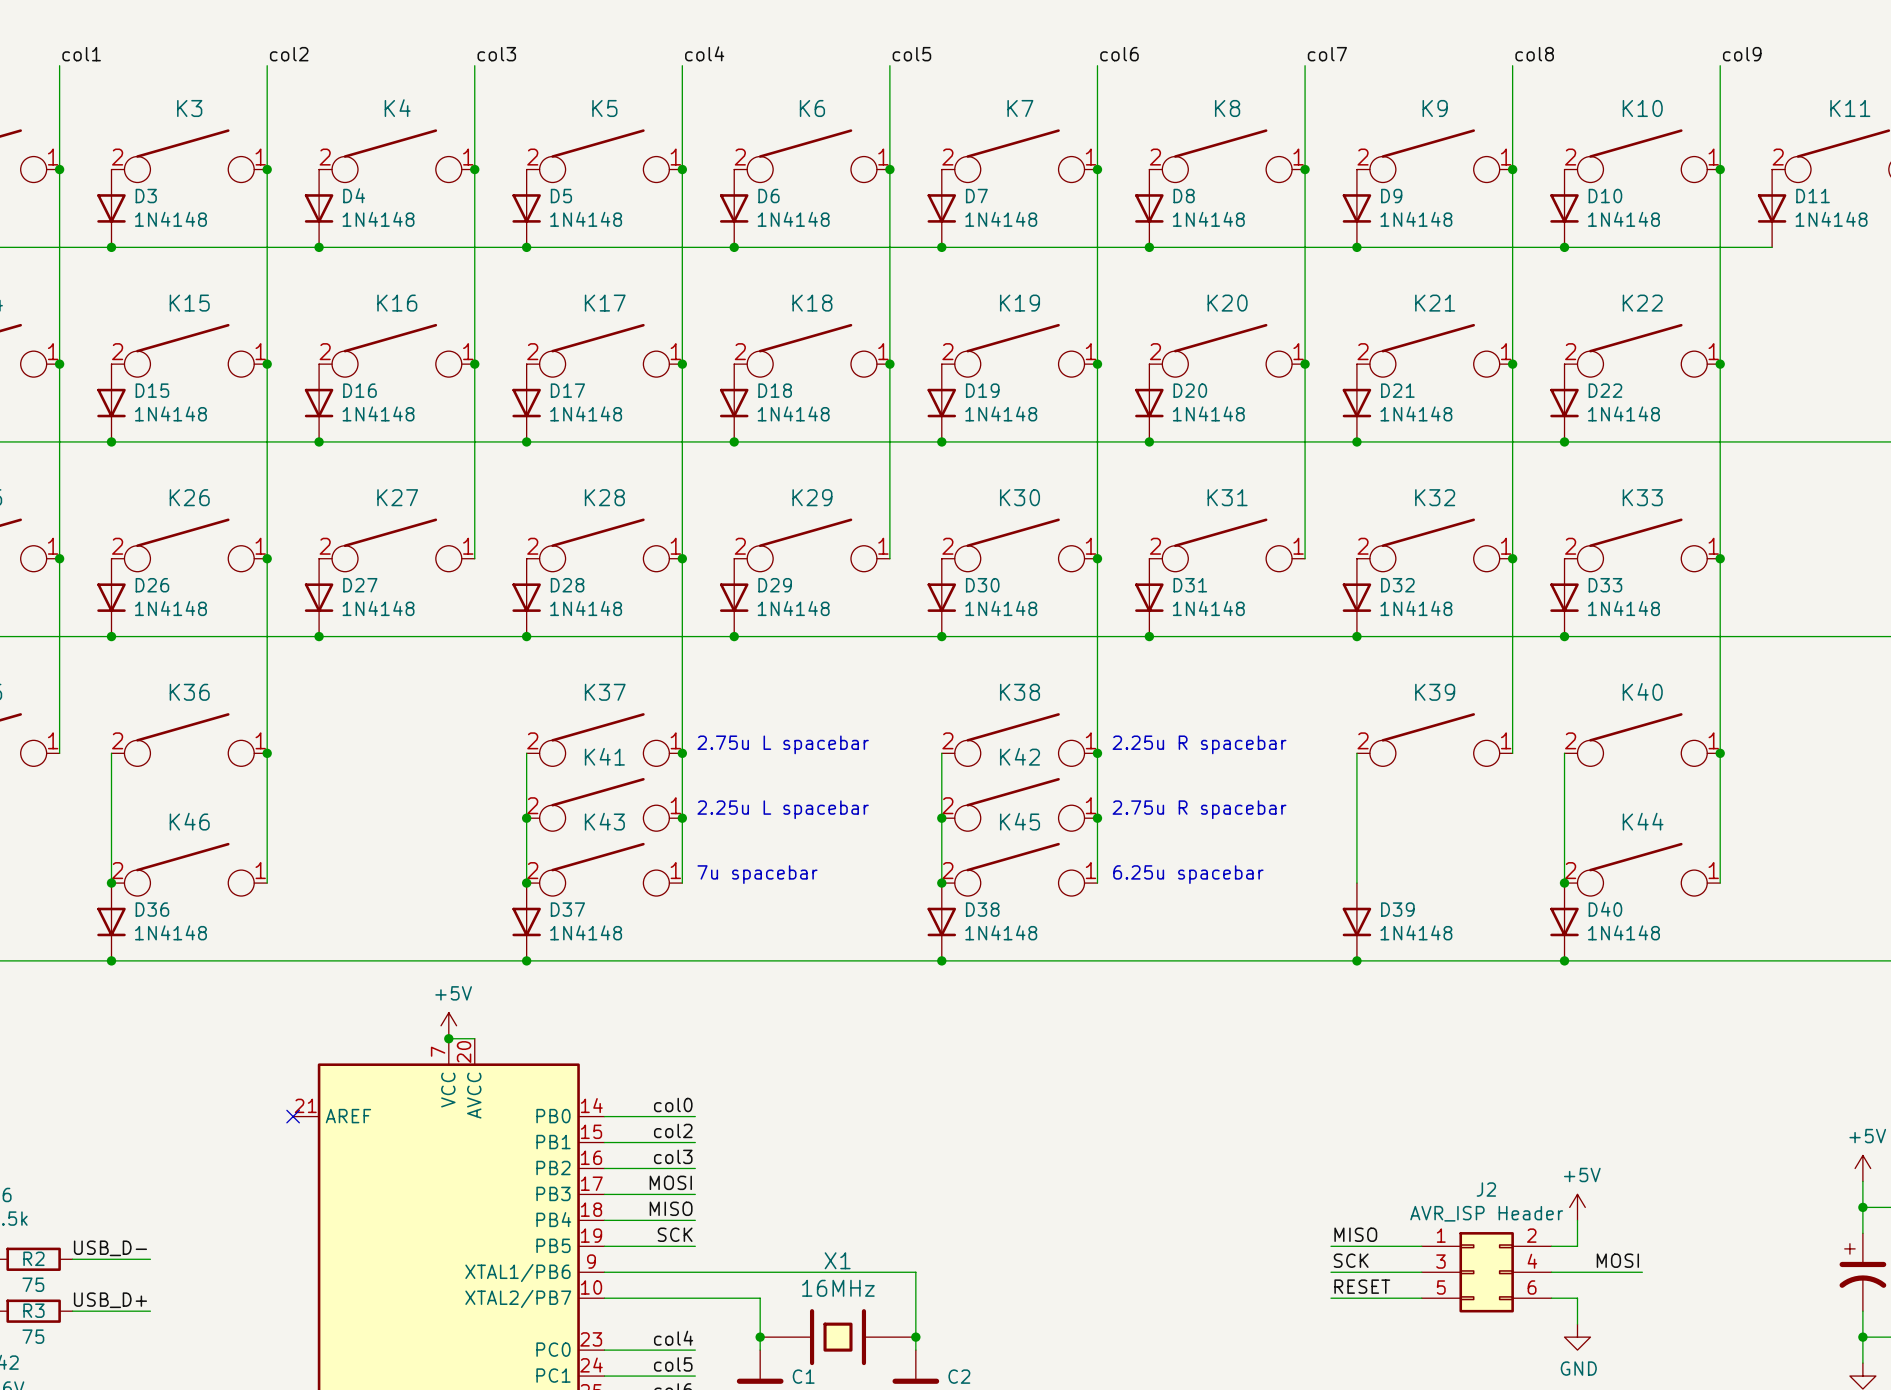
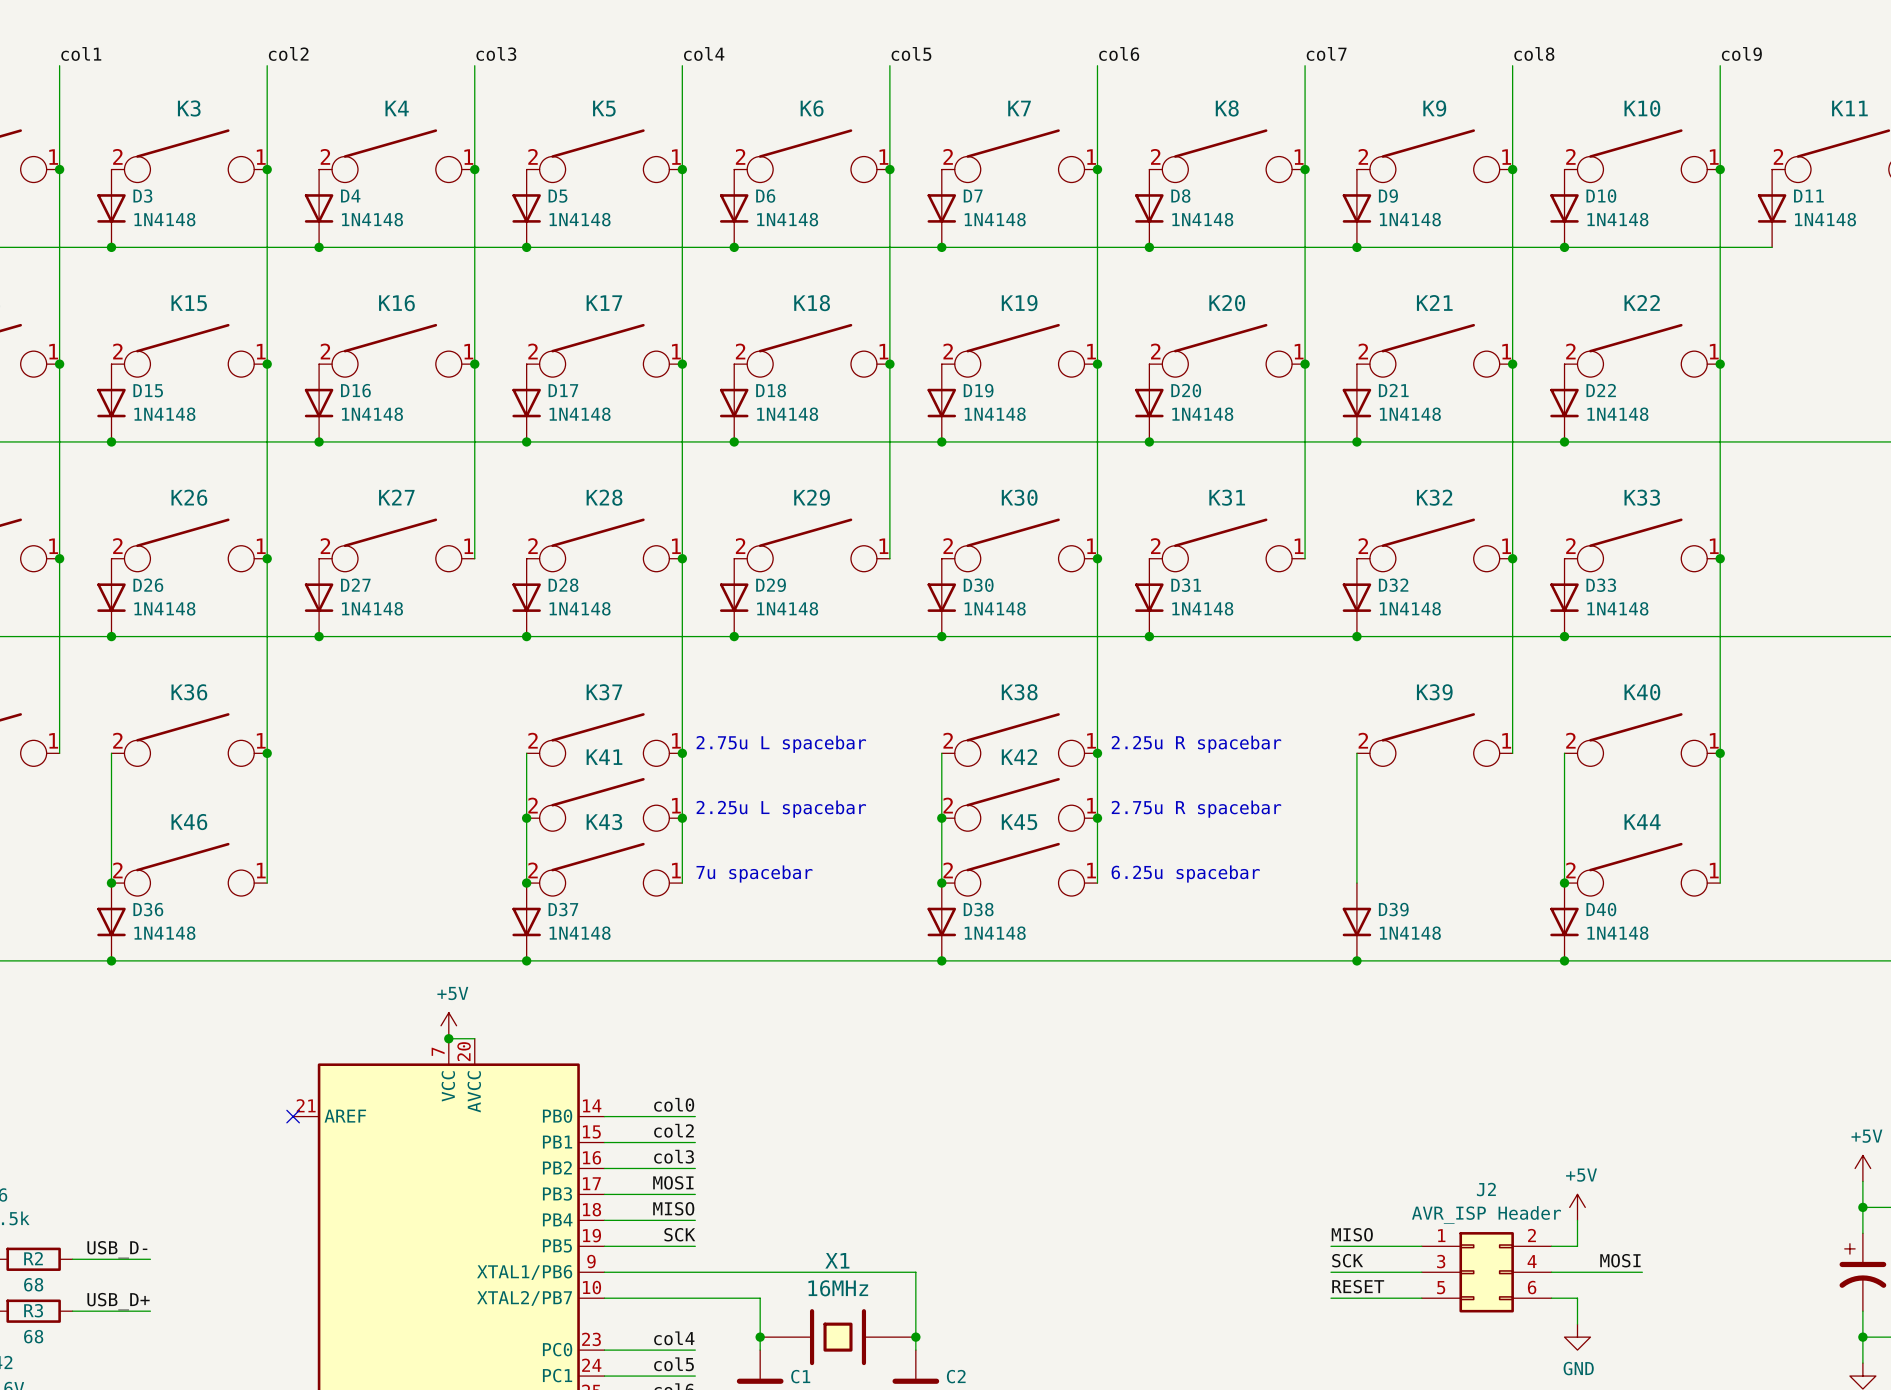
R2 value: 75 (33, 1284) -> 68 (33, 1284)
R3 value: 75 (33, 1336) -> 68 (33, 1336)

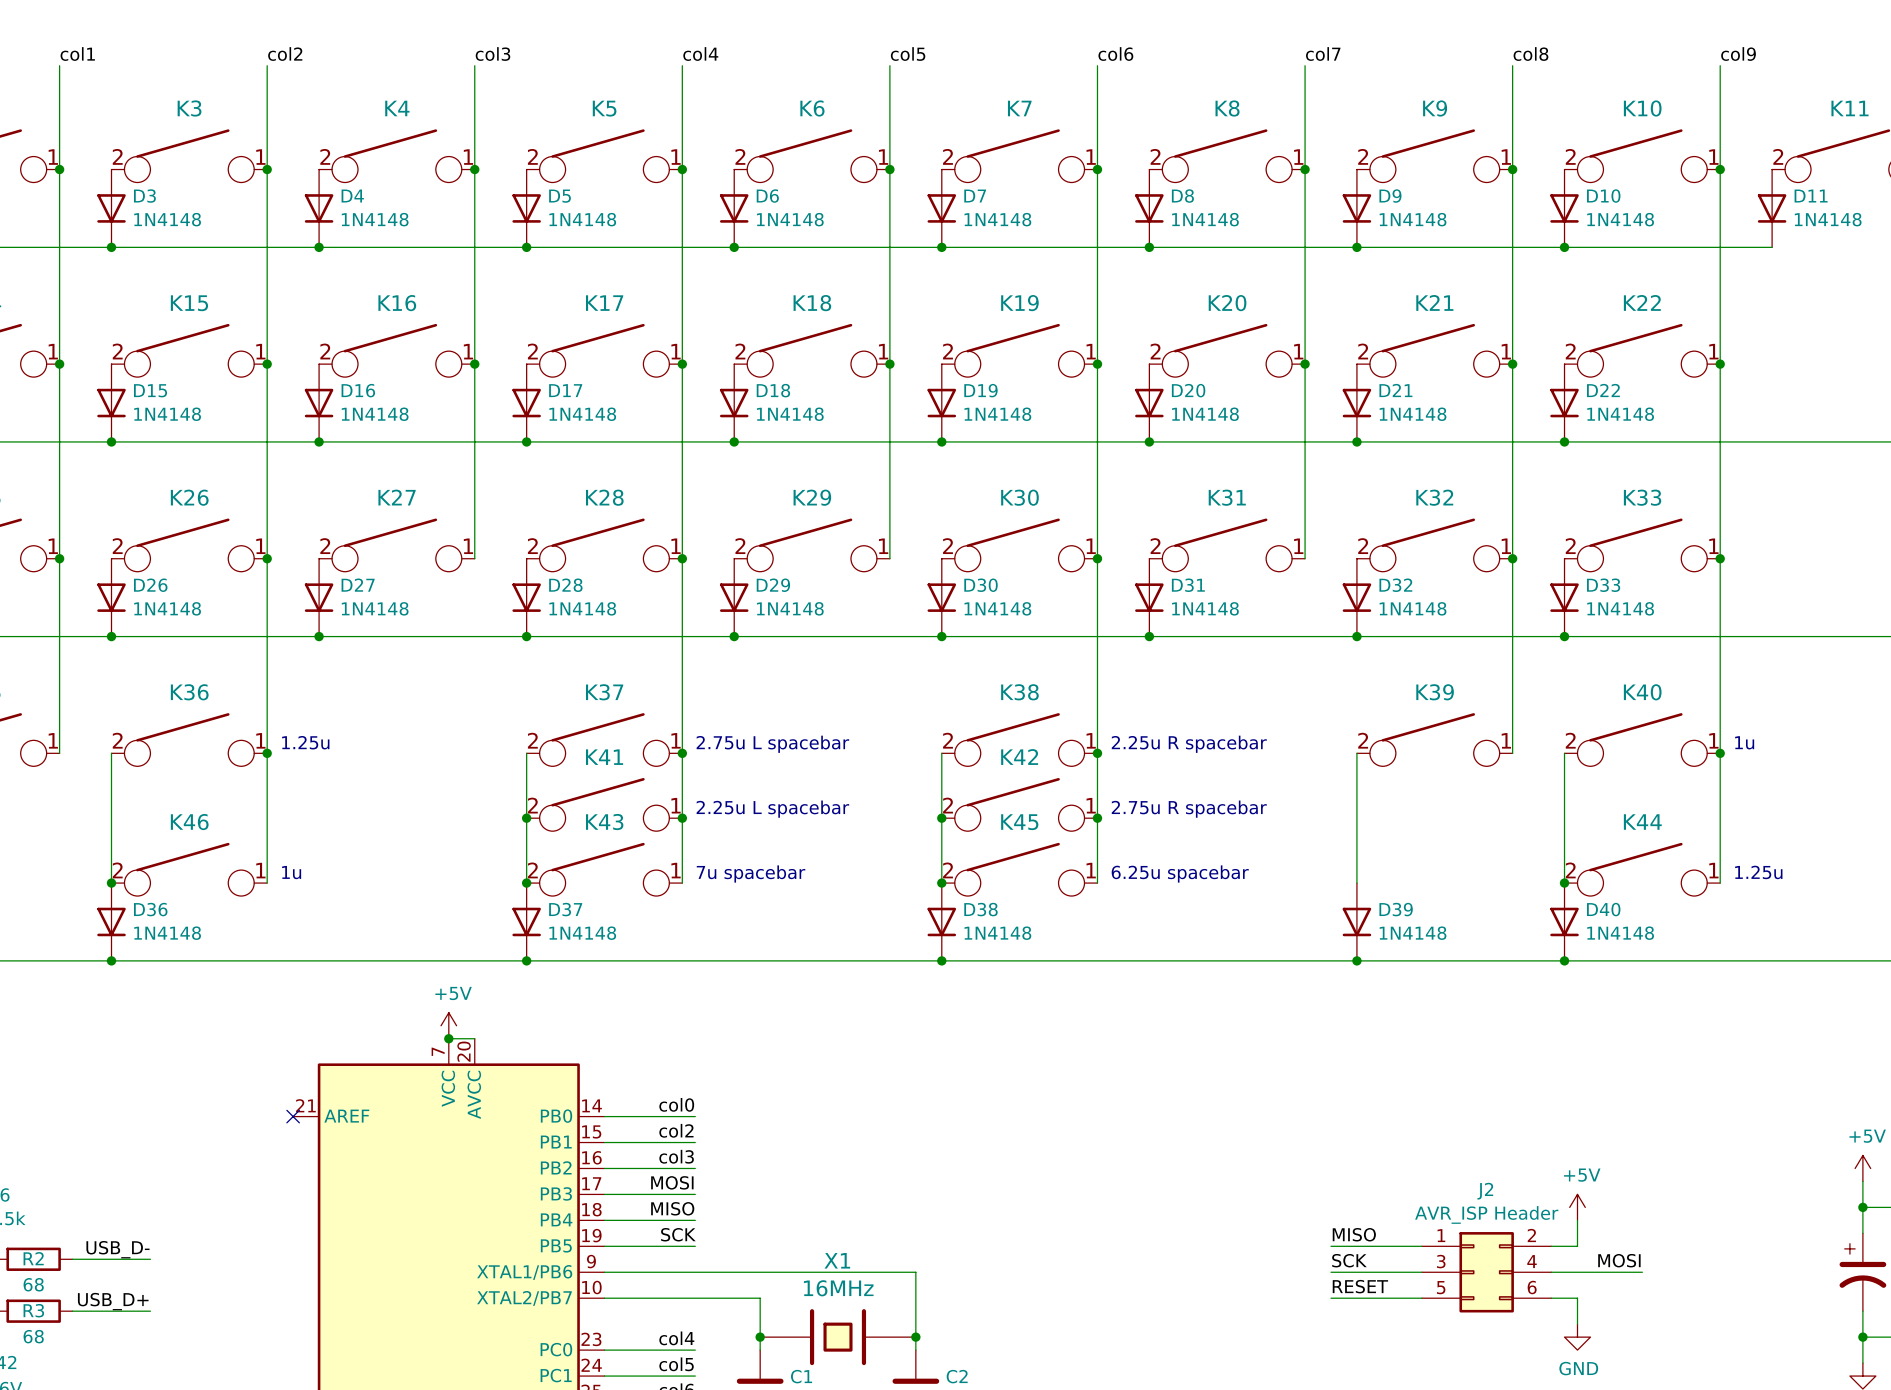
text: none -> 1.25u (305, 742)
text: none -> 1u (1744, 742)
text: none -> 1u (291, 872)
text: none -> 1.25u (1758, 872)

